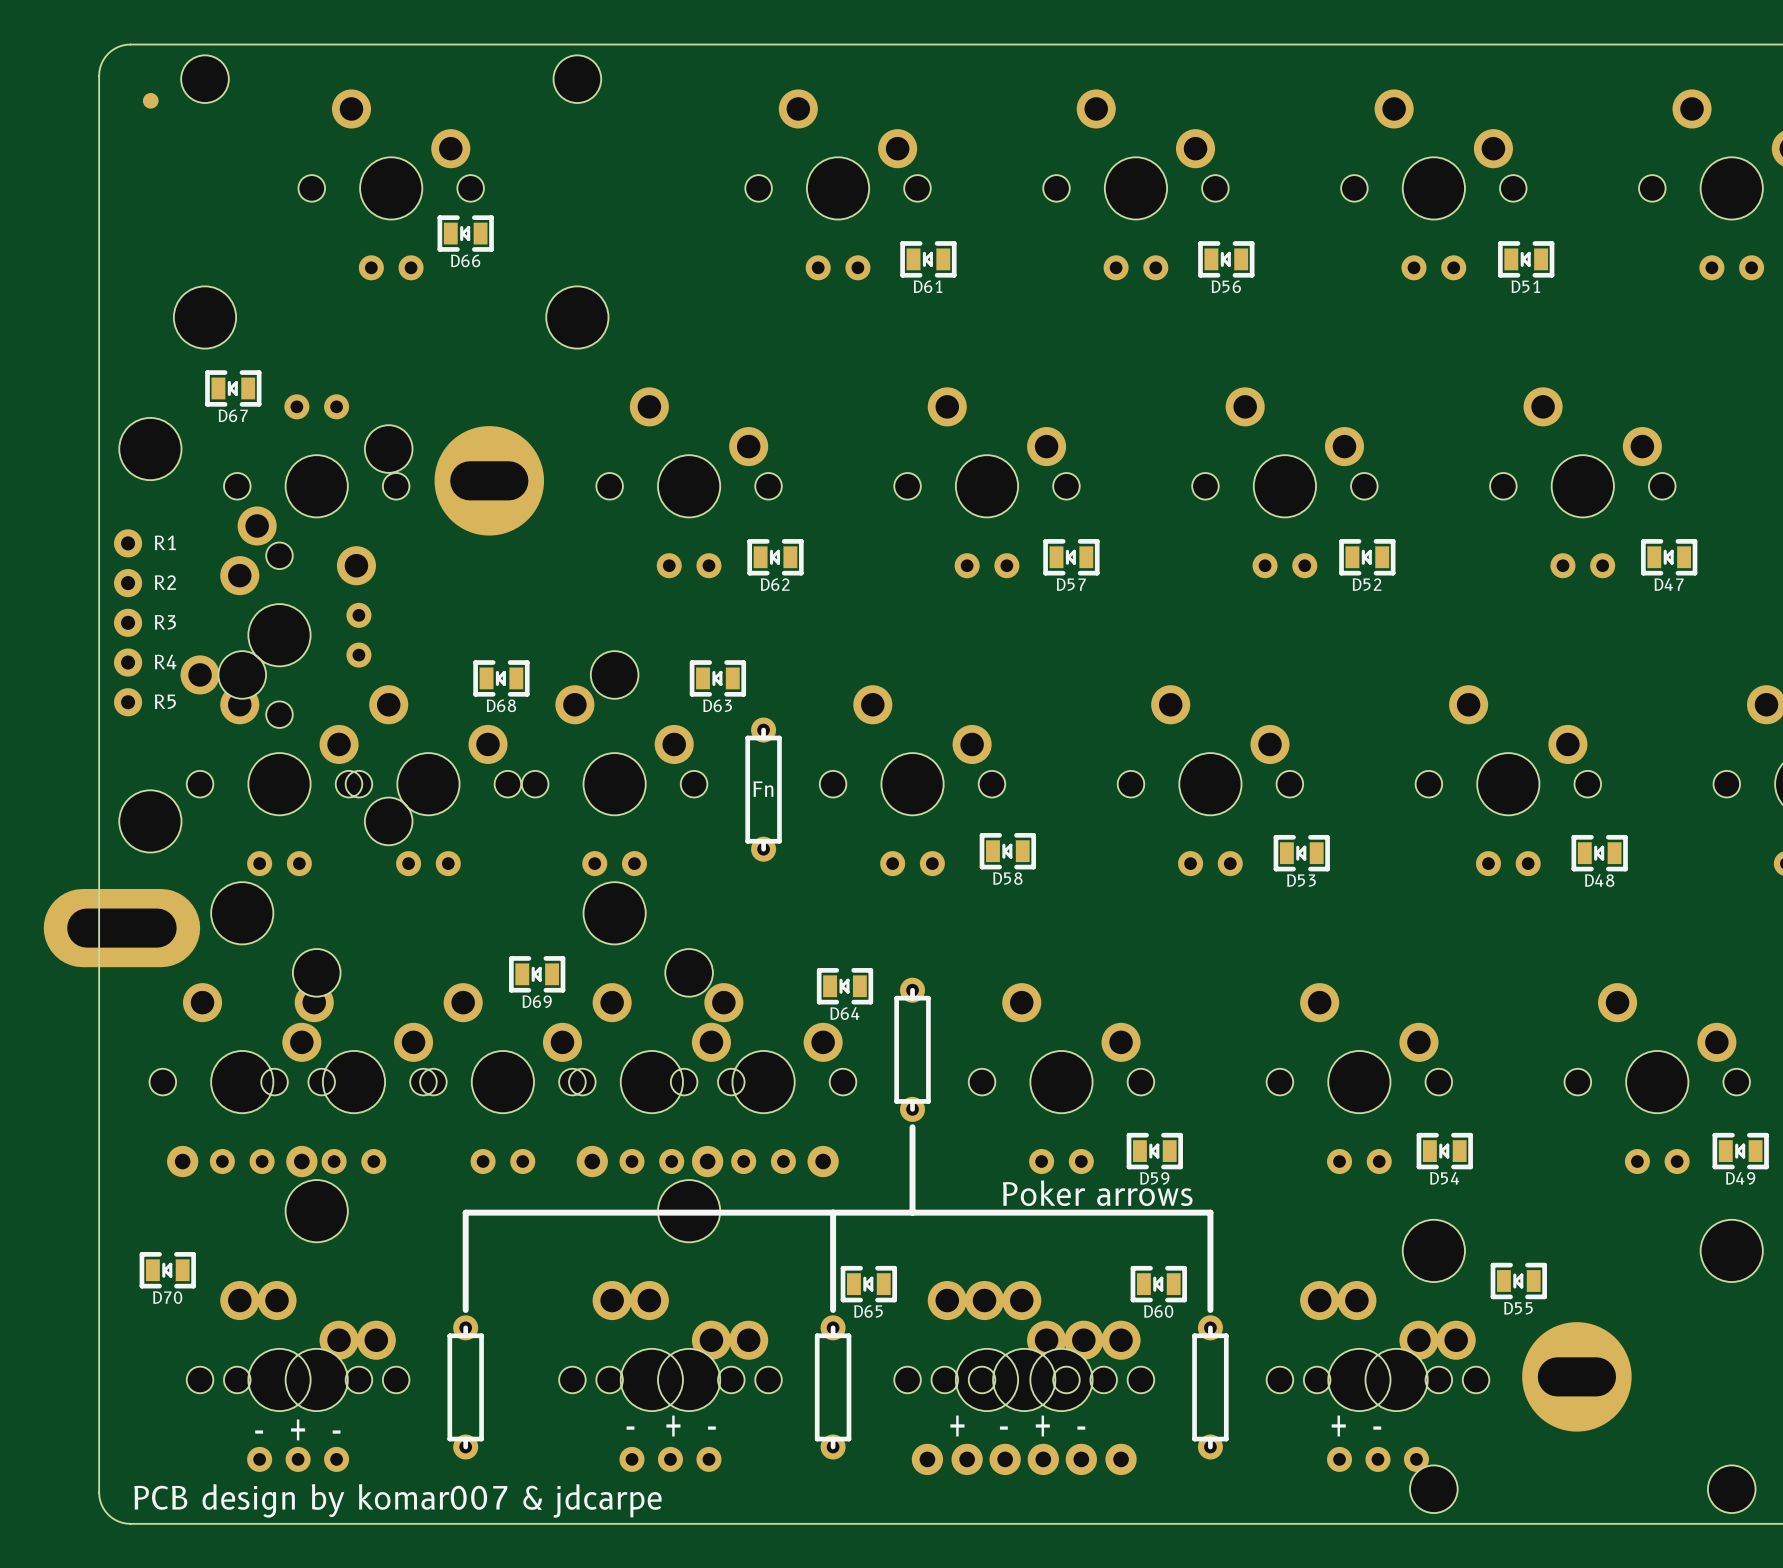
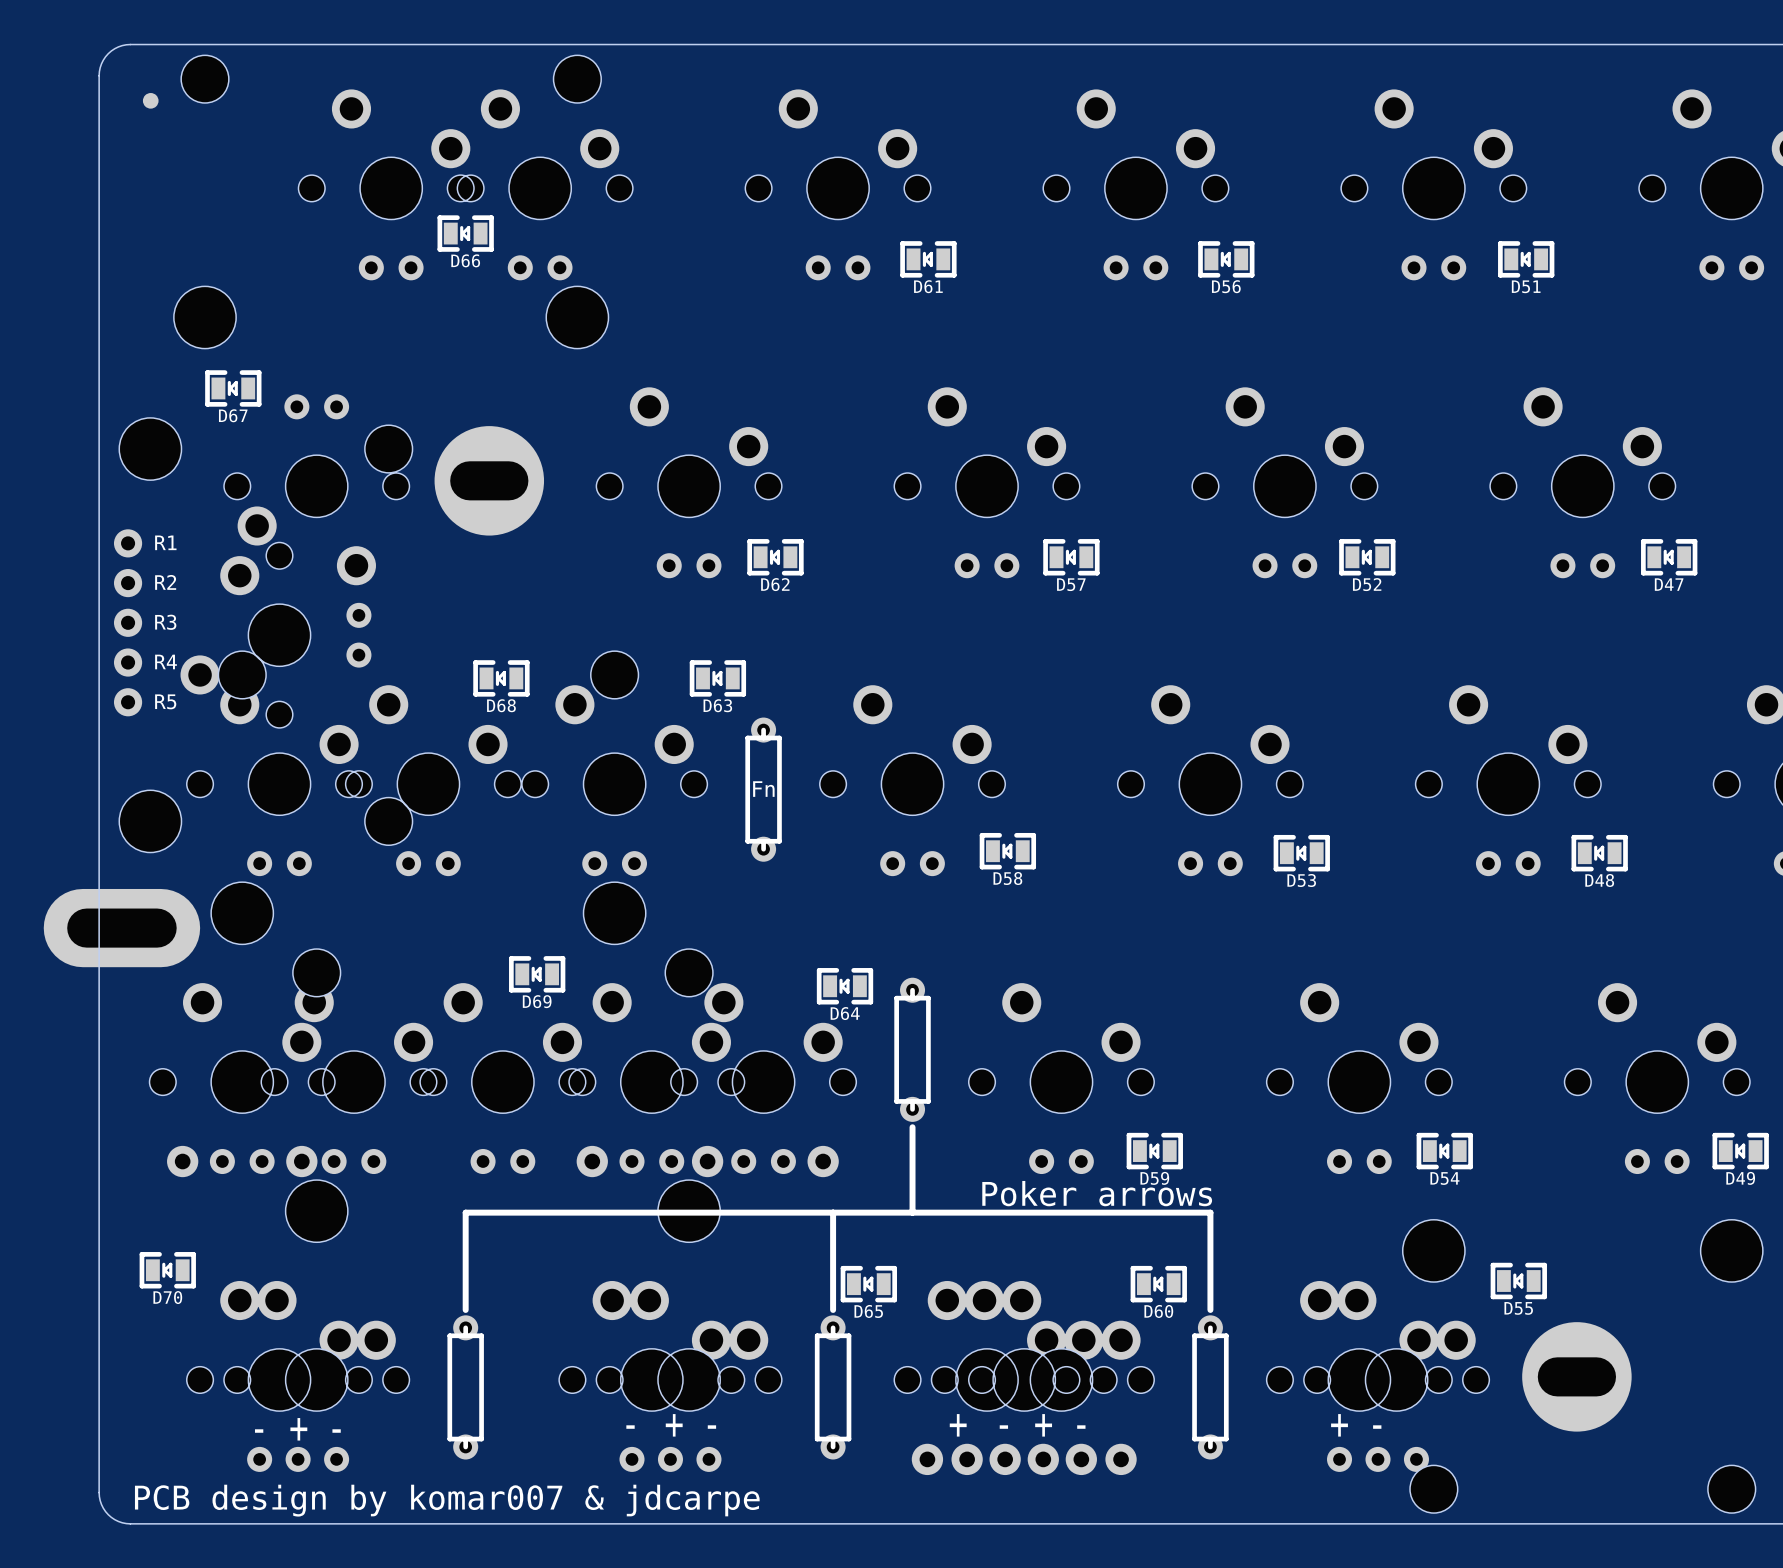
part: none -> (540, 154)
part: none -> (540, 267)

